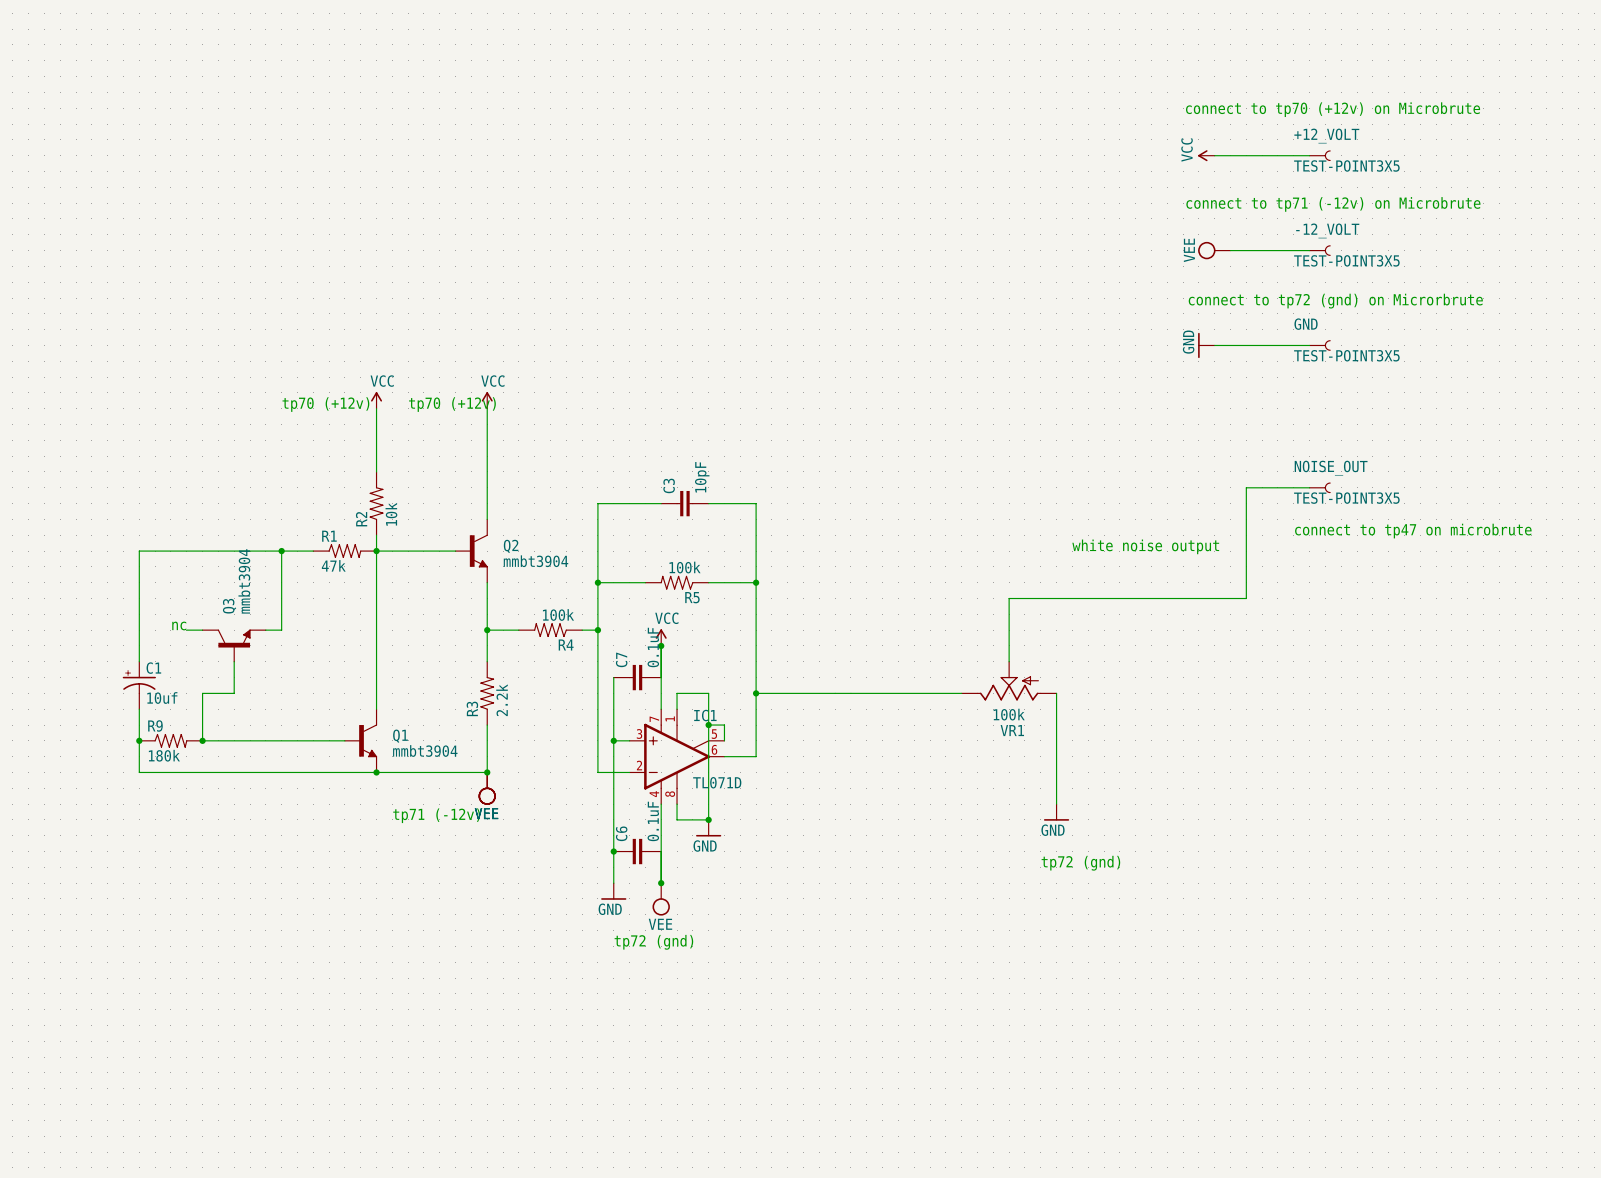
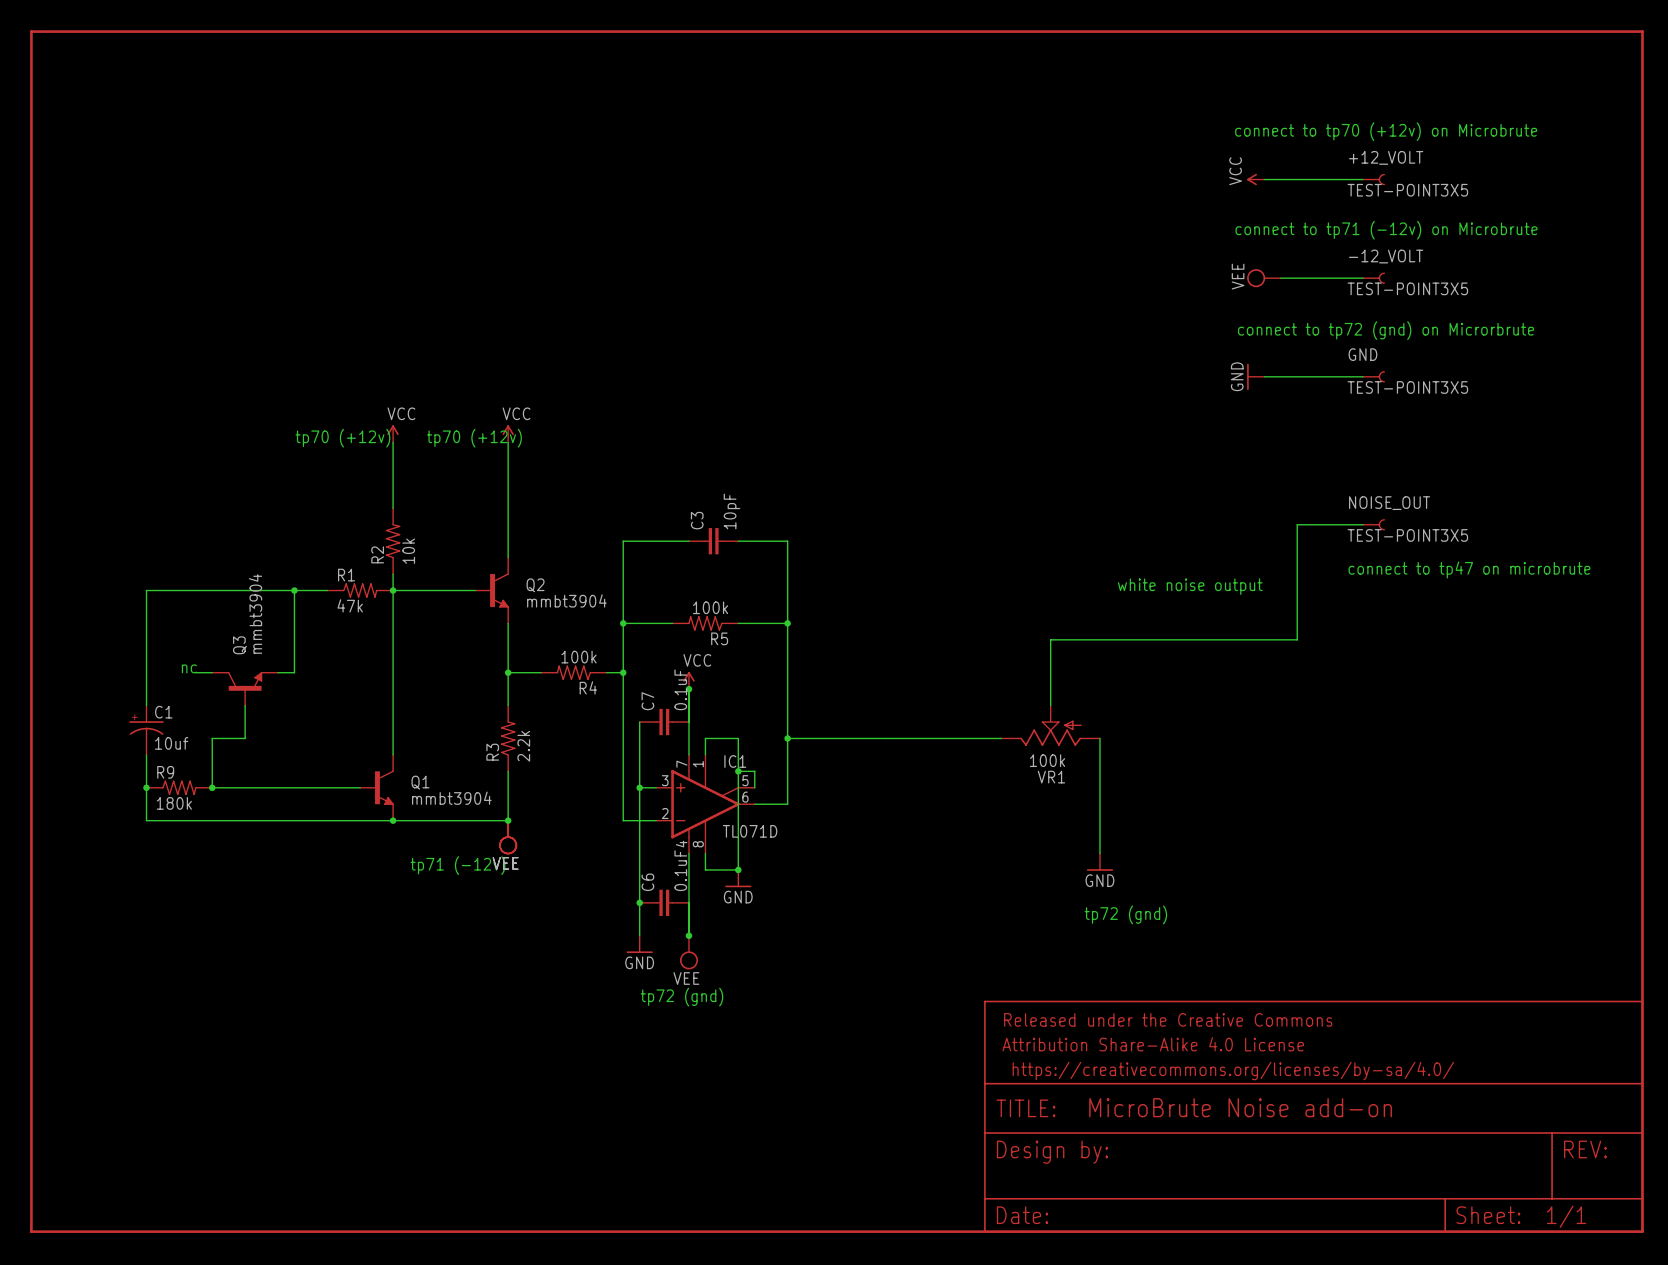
part: none -> (836, 631)
part: none -> (1313, 1116)

